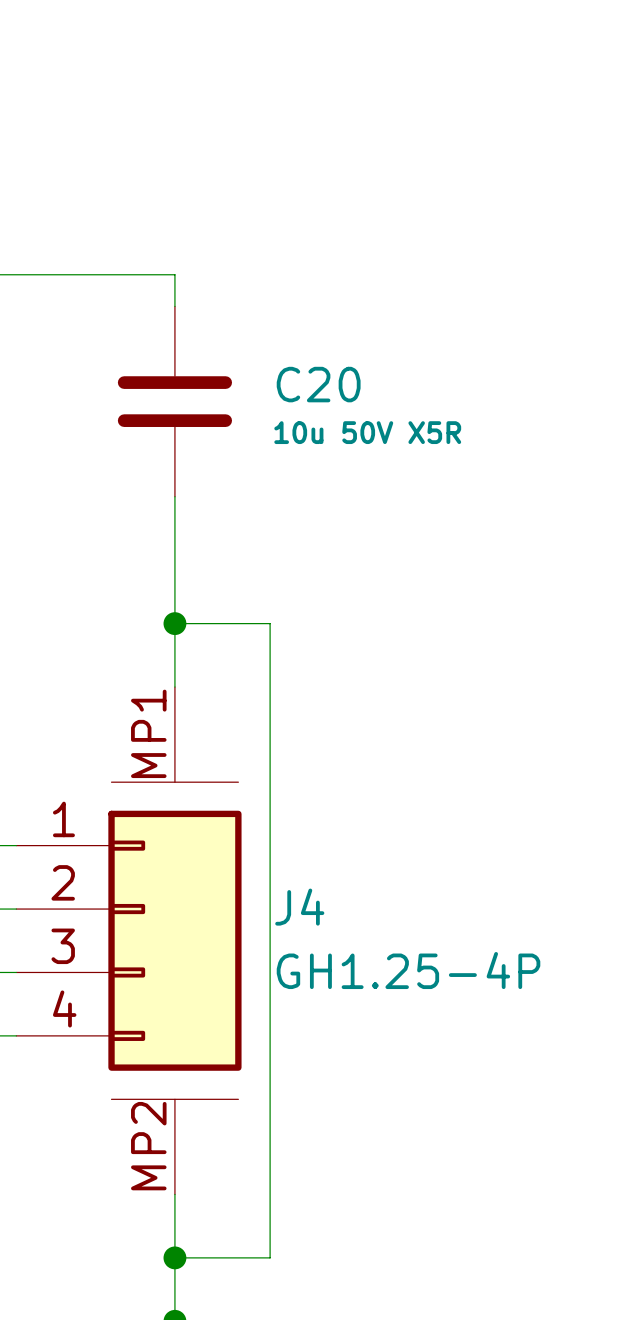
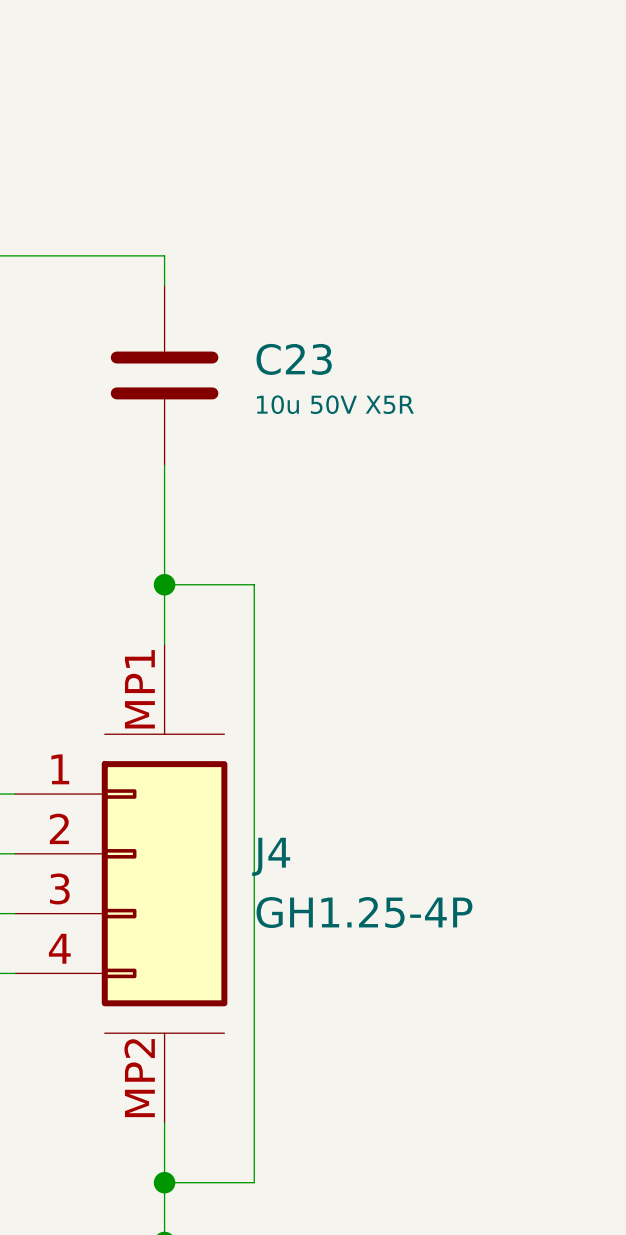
C20 name: C20 (318, 384) -> C23 (294, 359)

